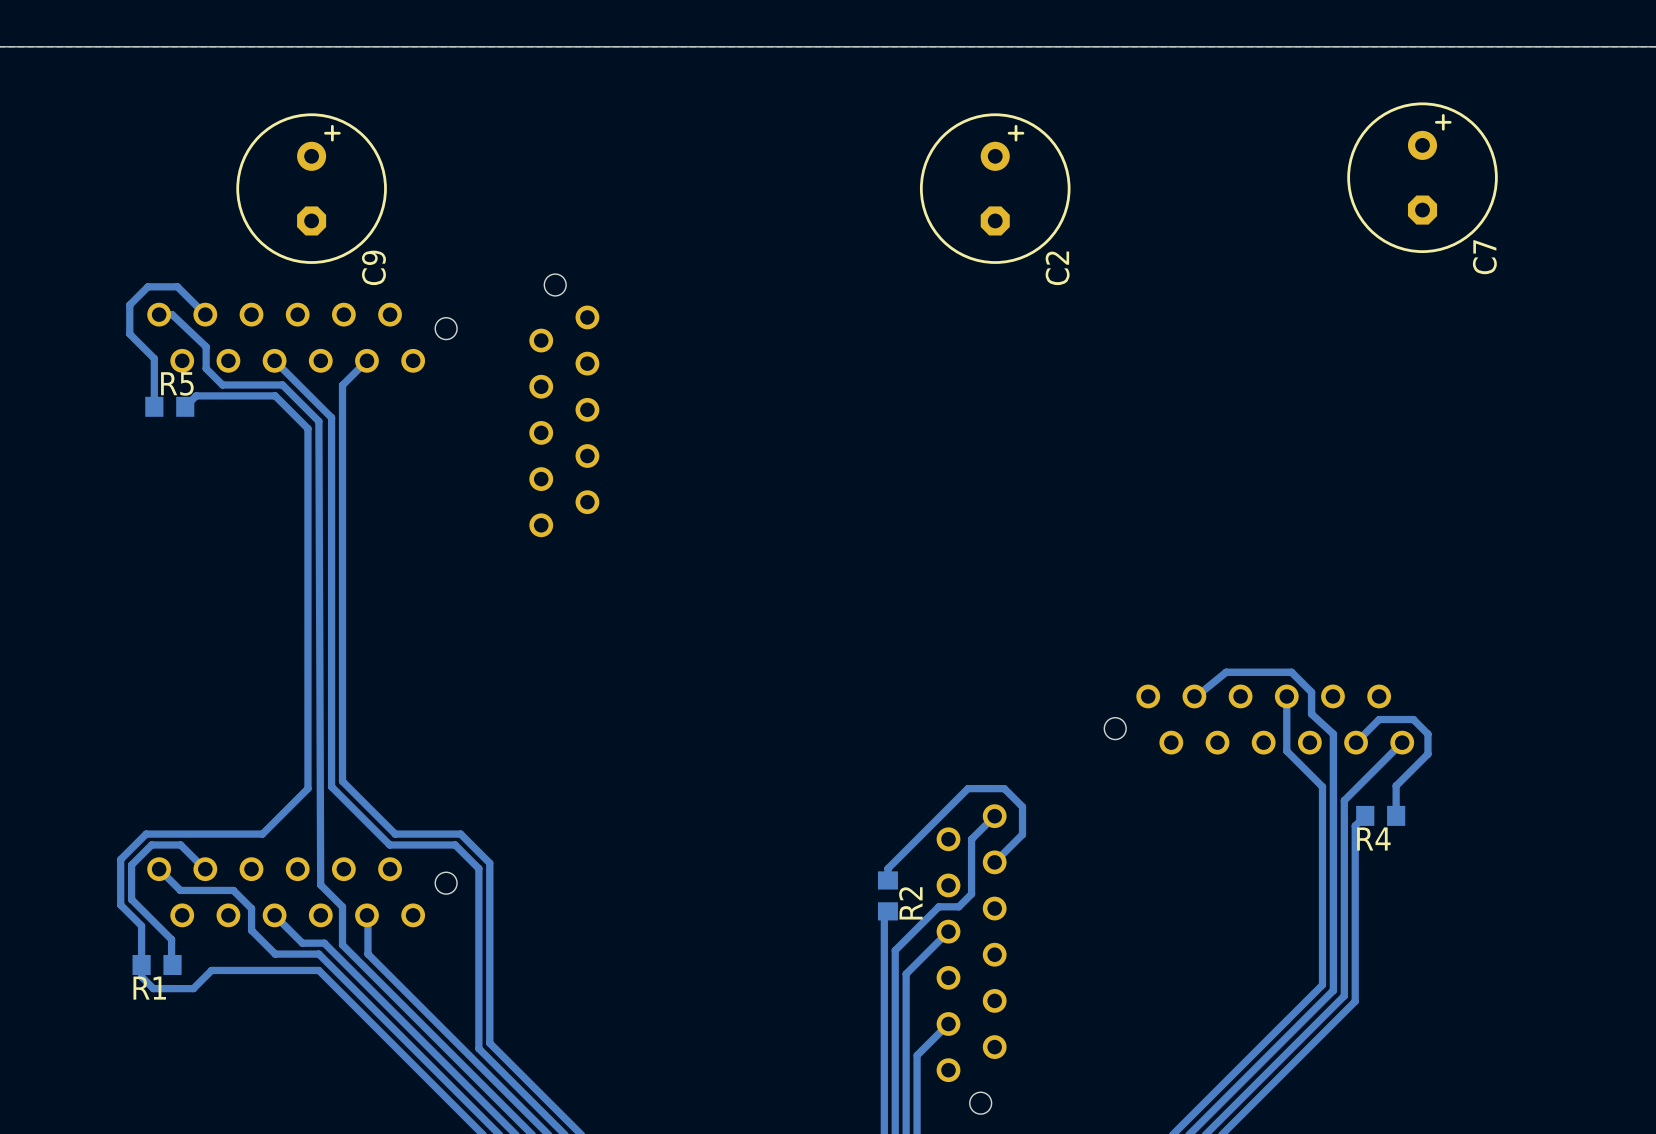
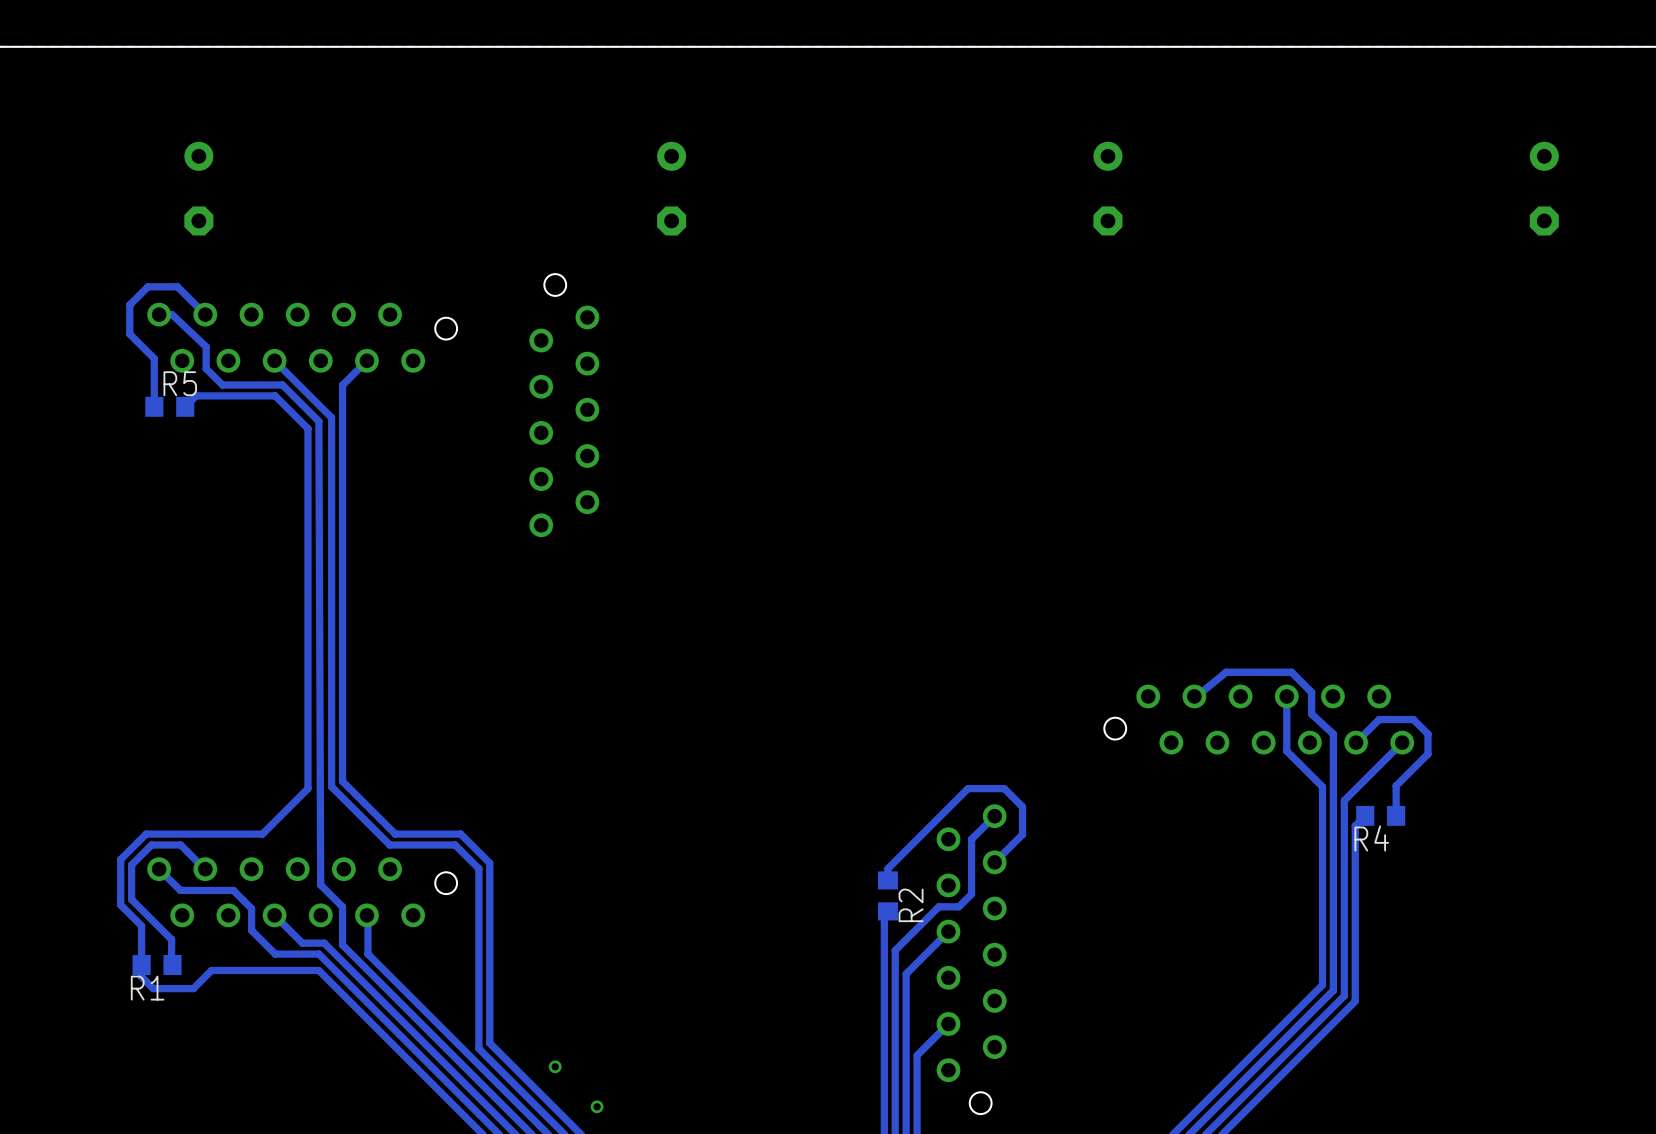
C7 side: bottom (1422, 177) -> top (1107, 188)
C9 side: bottom (311, 188) -> top (198, 188)
C2 side: bottom (995, 188) -> top (671, 188)
part: none -> (1544, 188)
via: none -> (555, 1066)
via: none -> (597, 1106)

